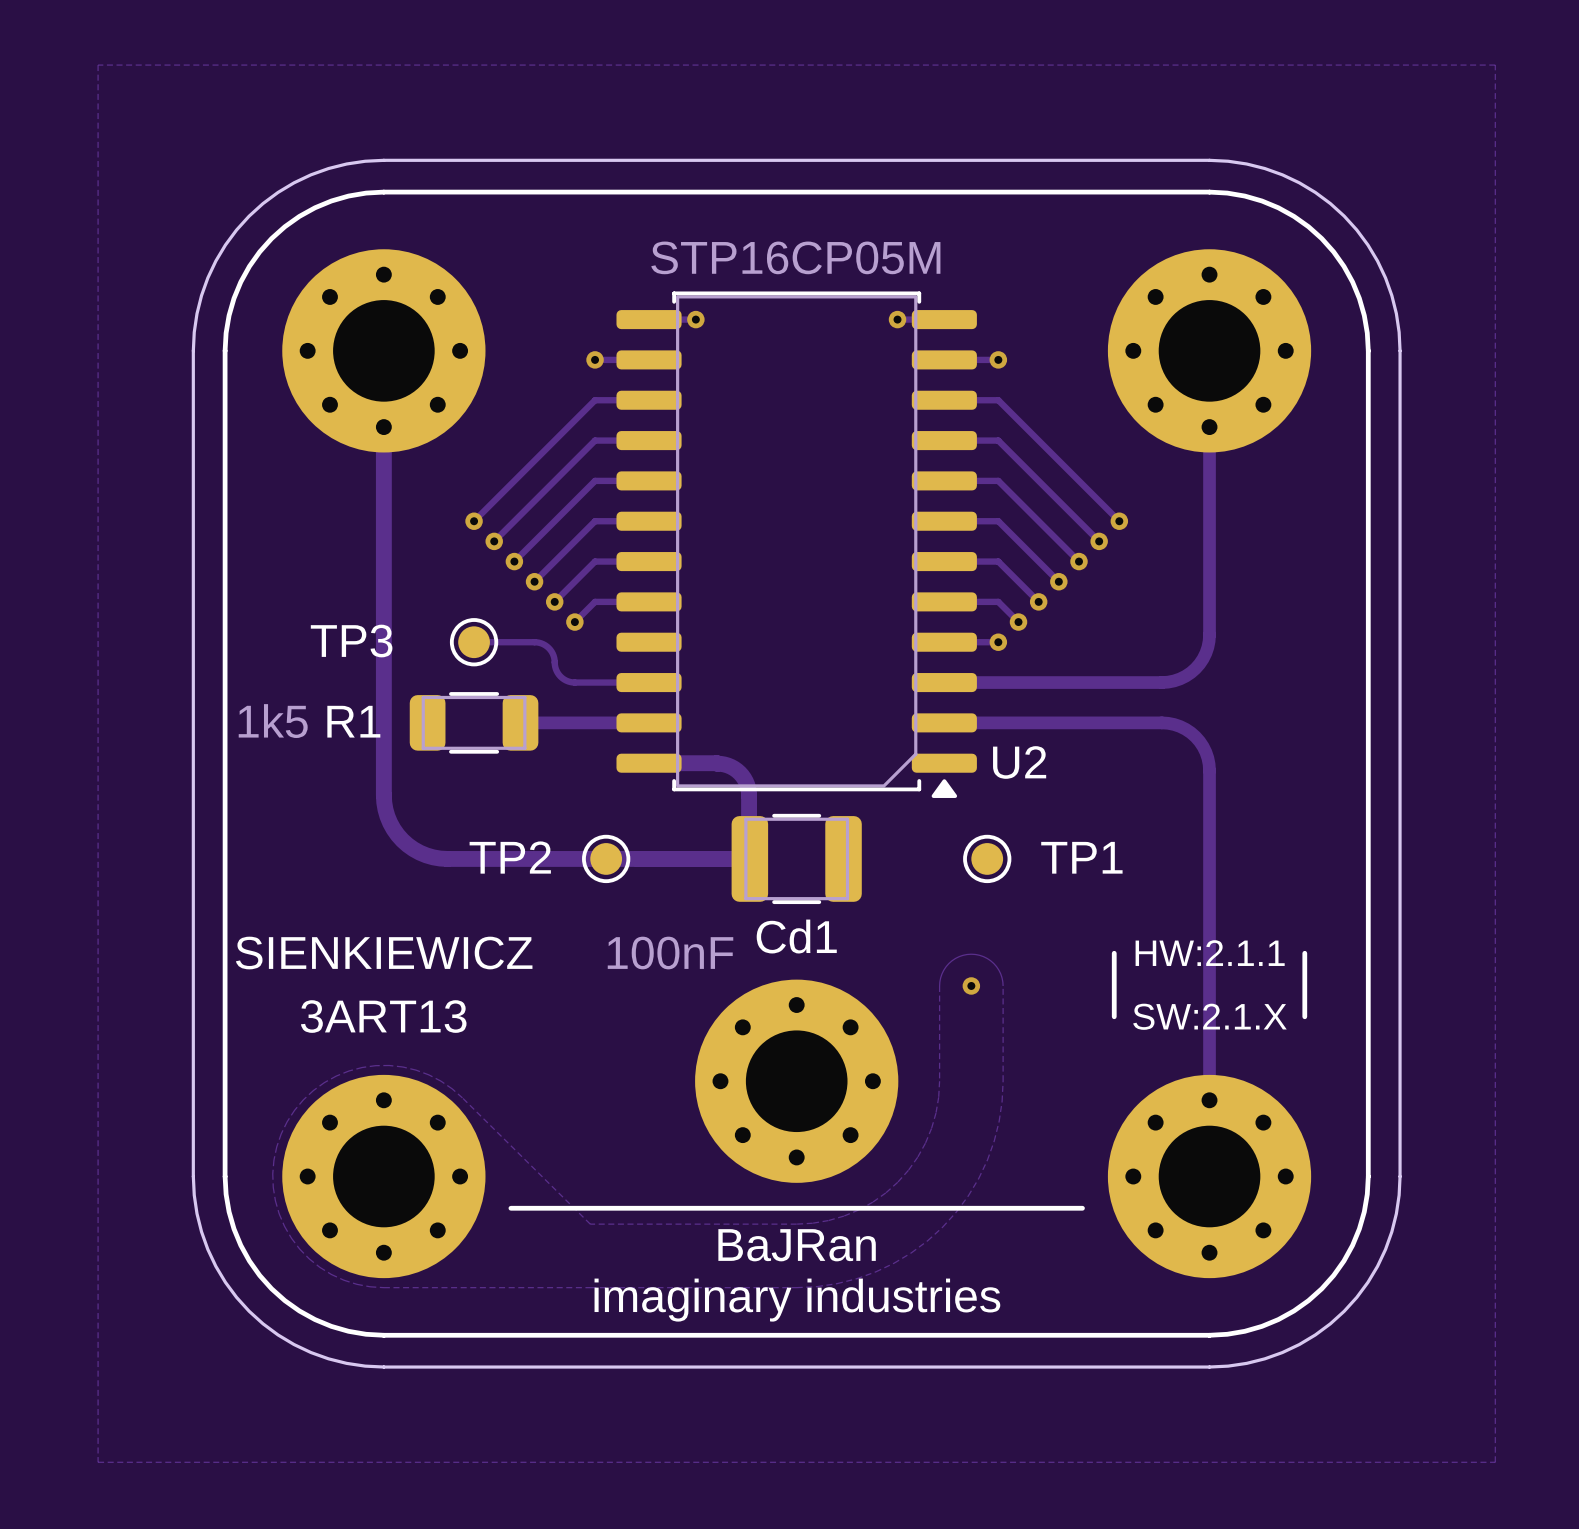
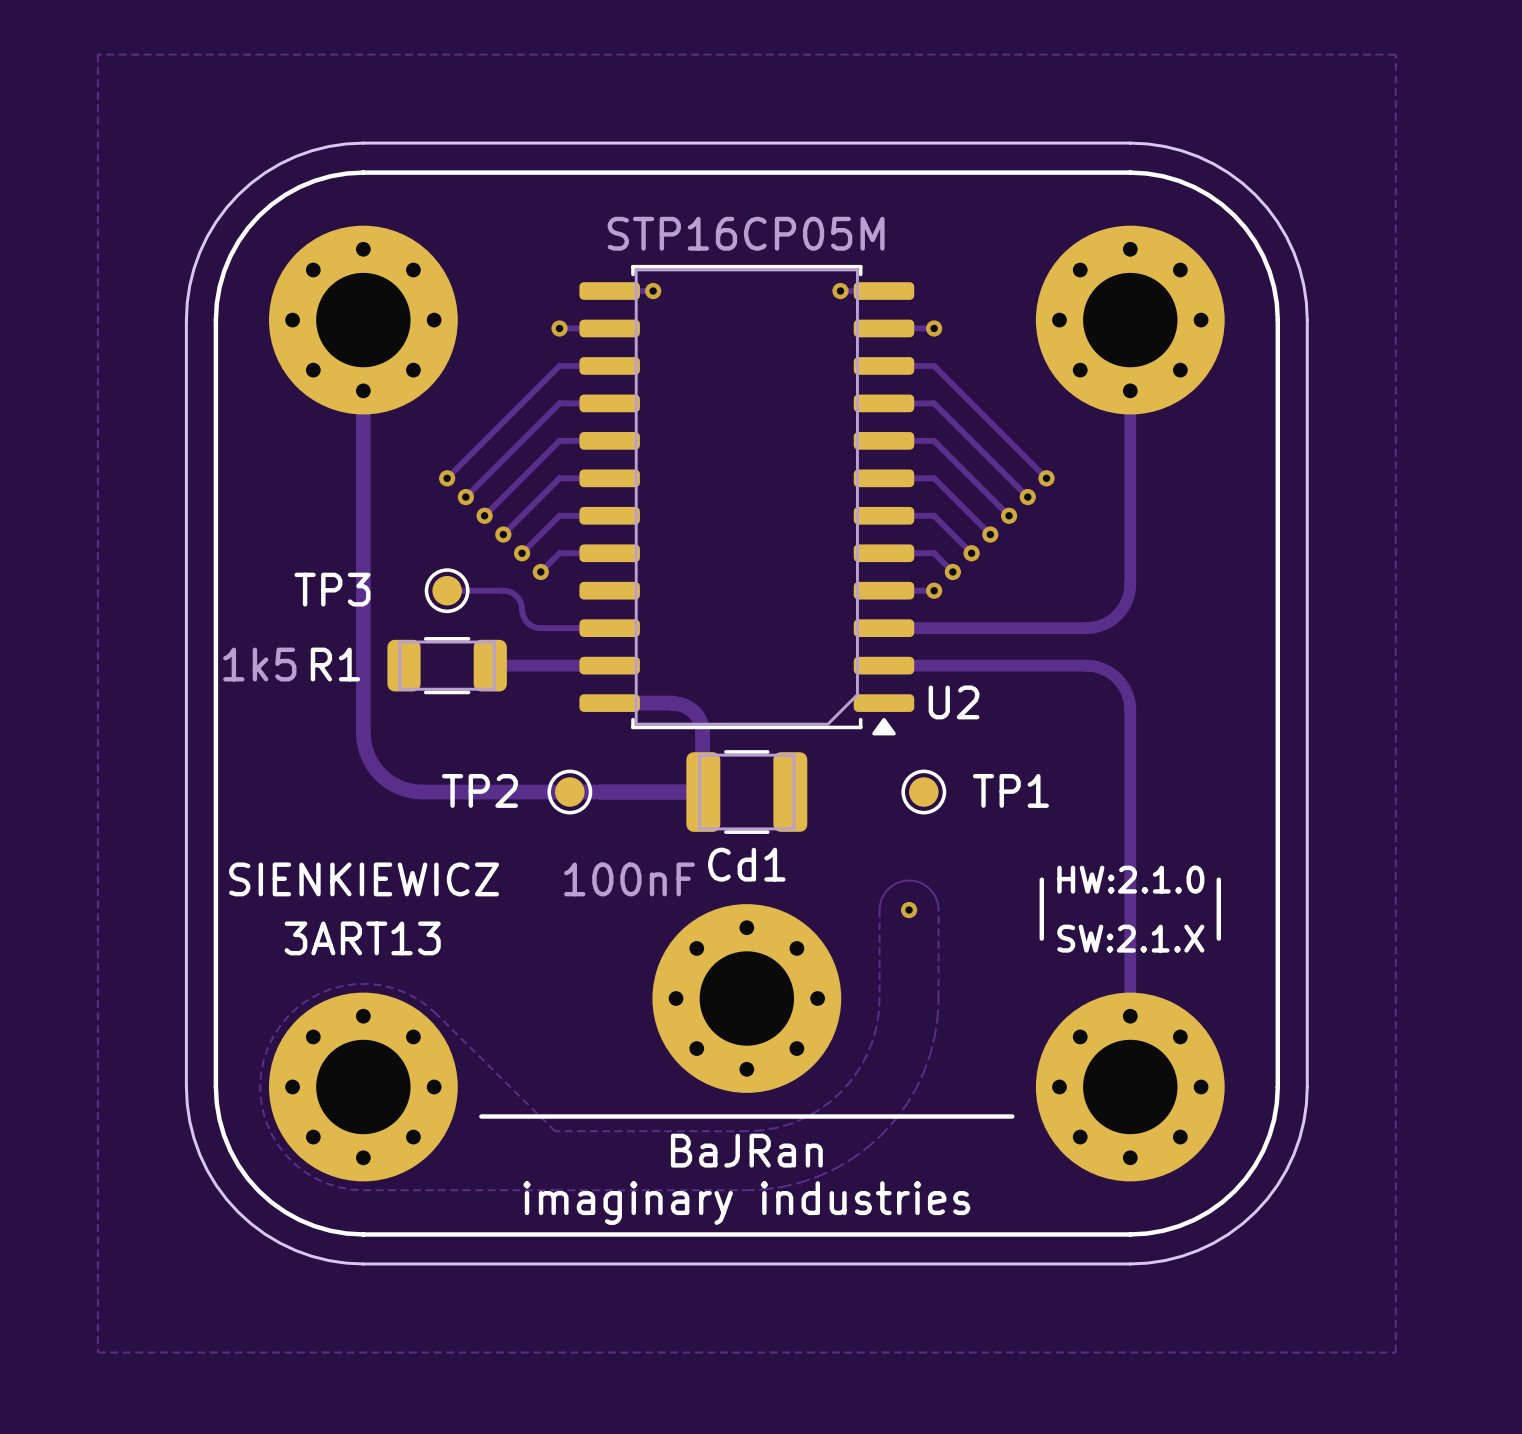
text: HW:2.1.1 (1210, 953) -> HW:2.1.0 (1130, 879)

